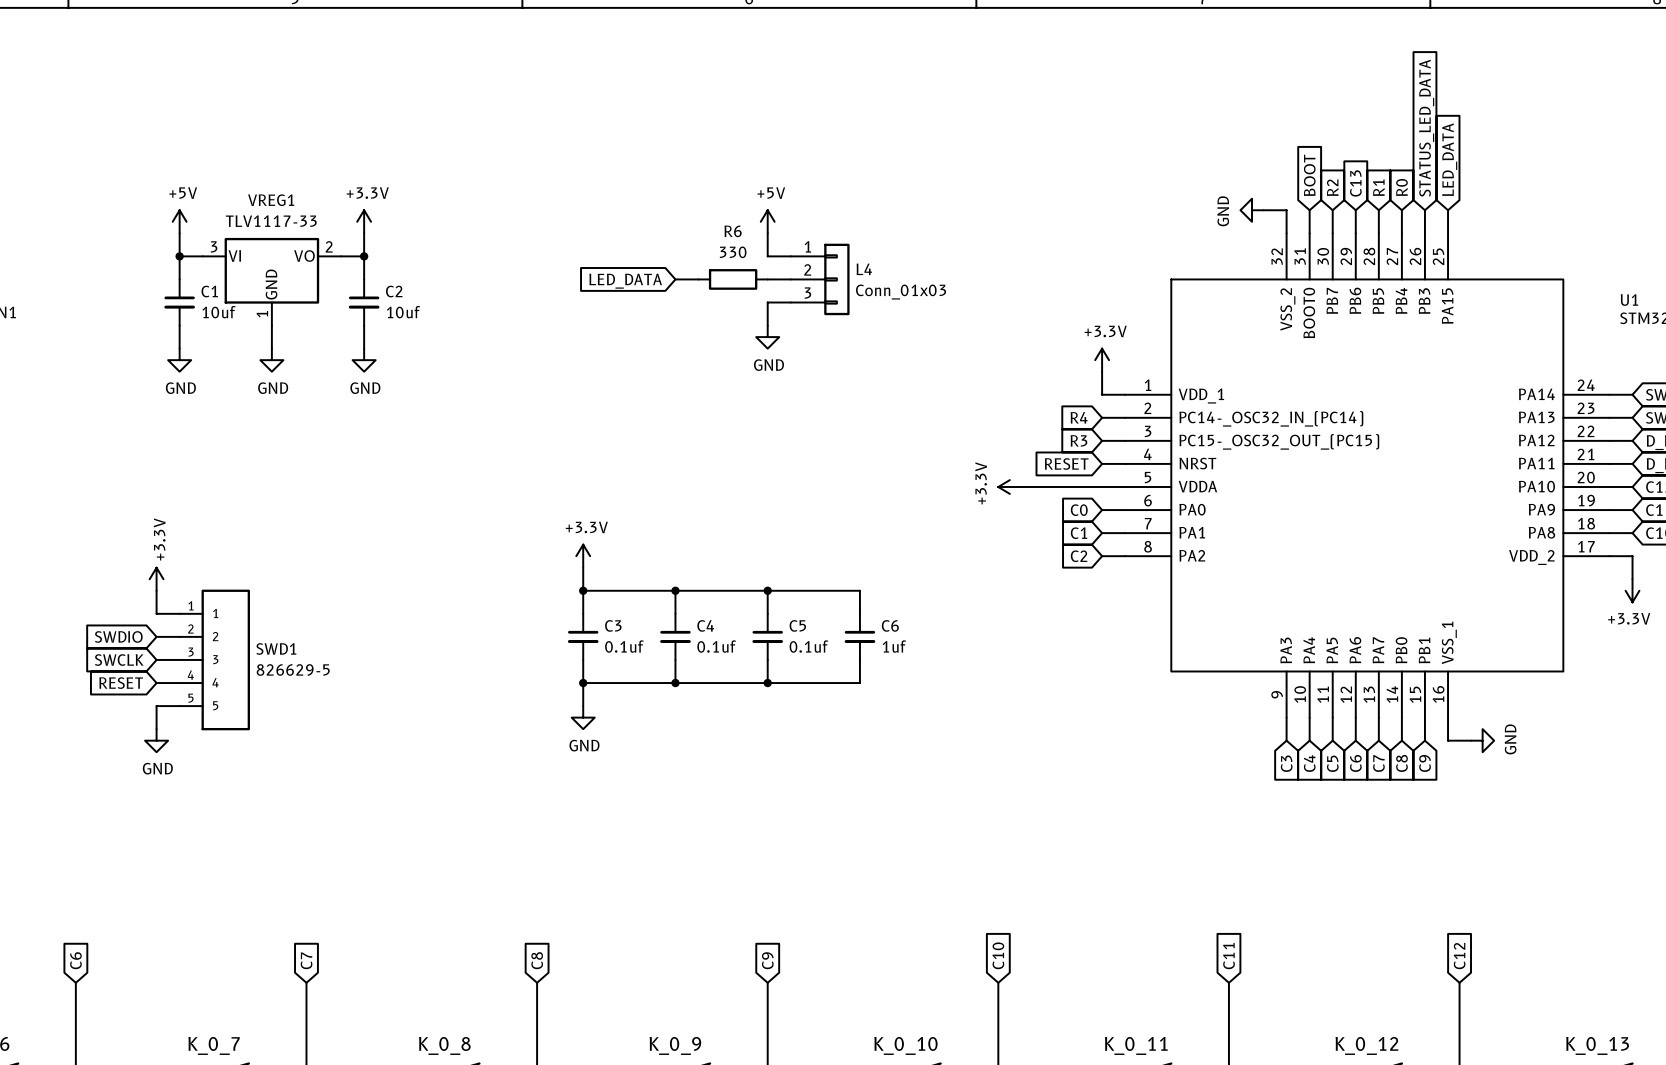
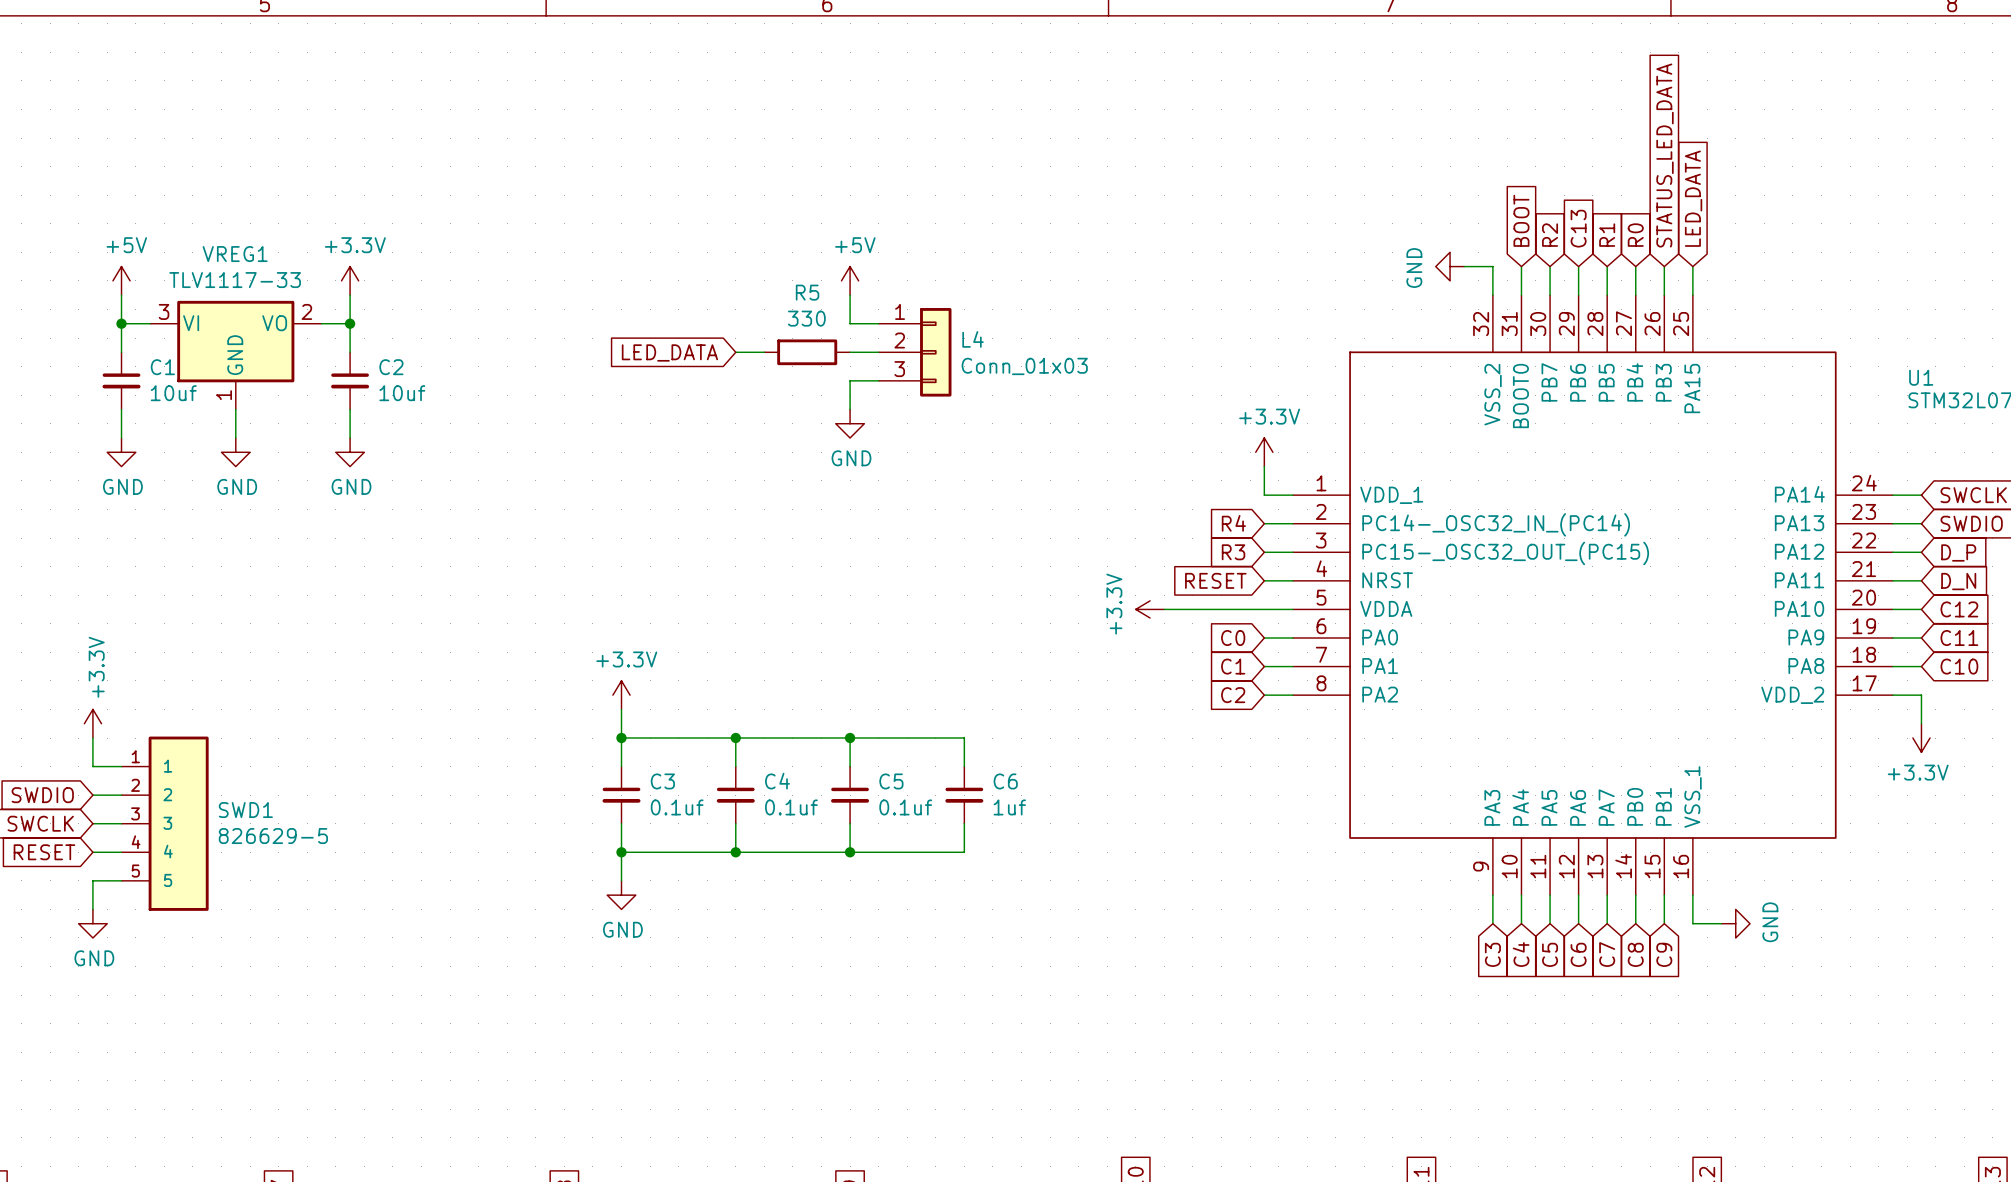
R6 name: R6 (733, 231) -> R5 (807, 292)

